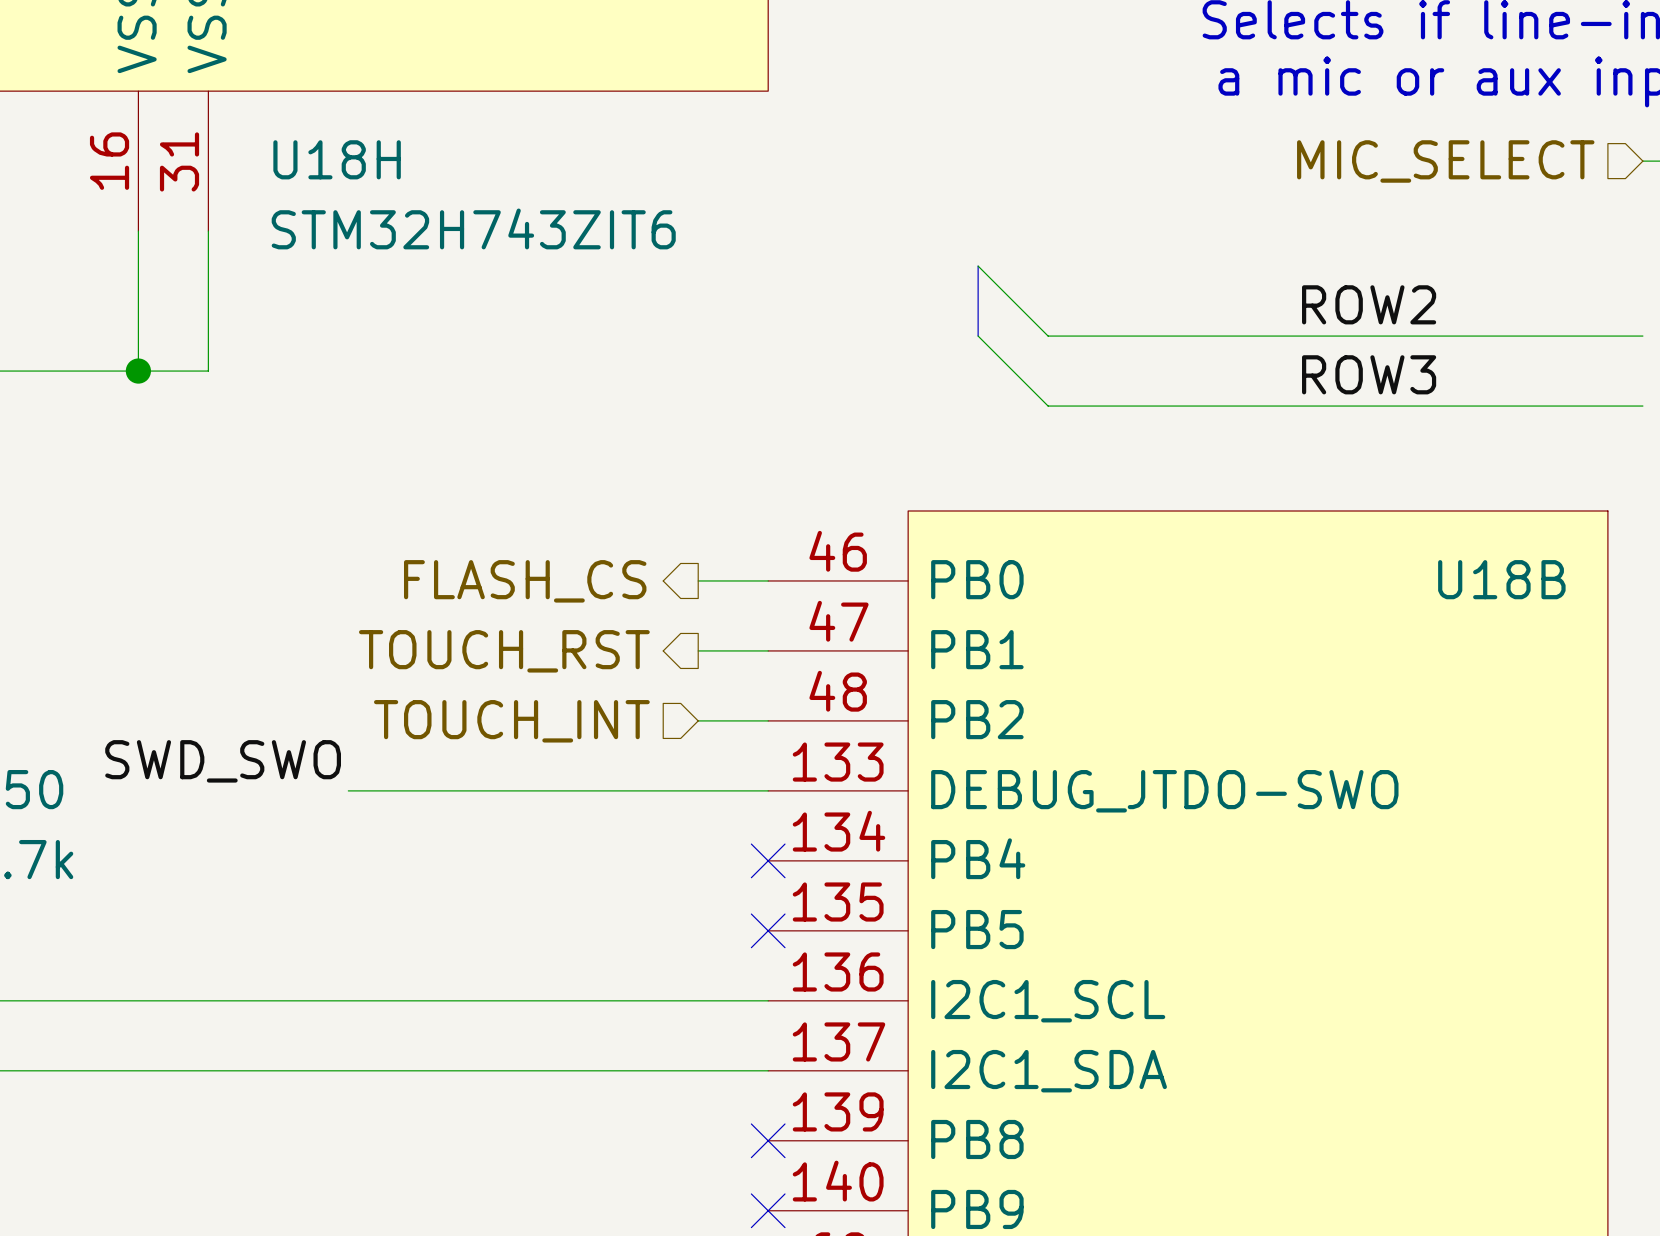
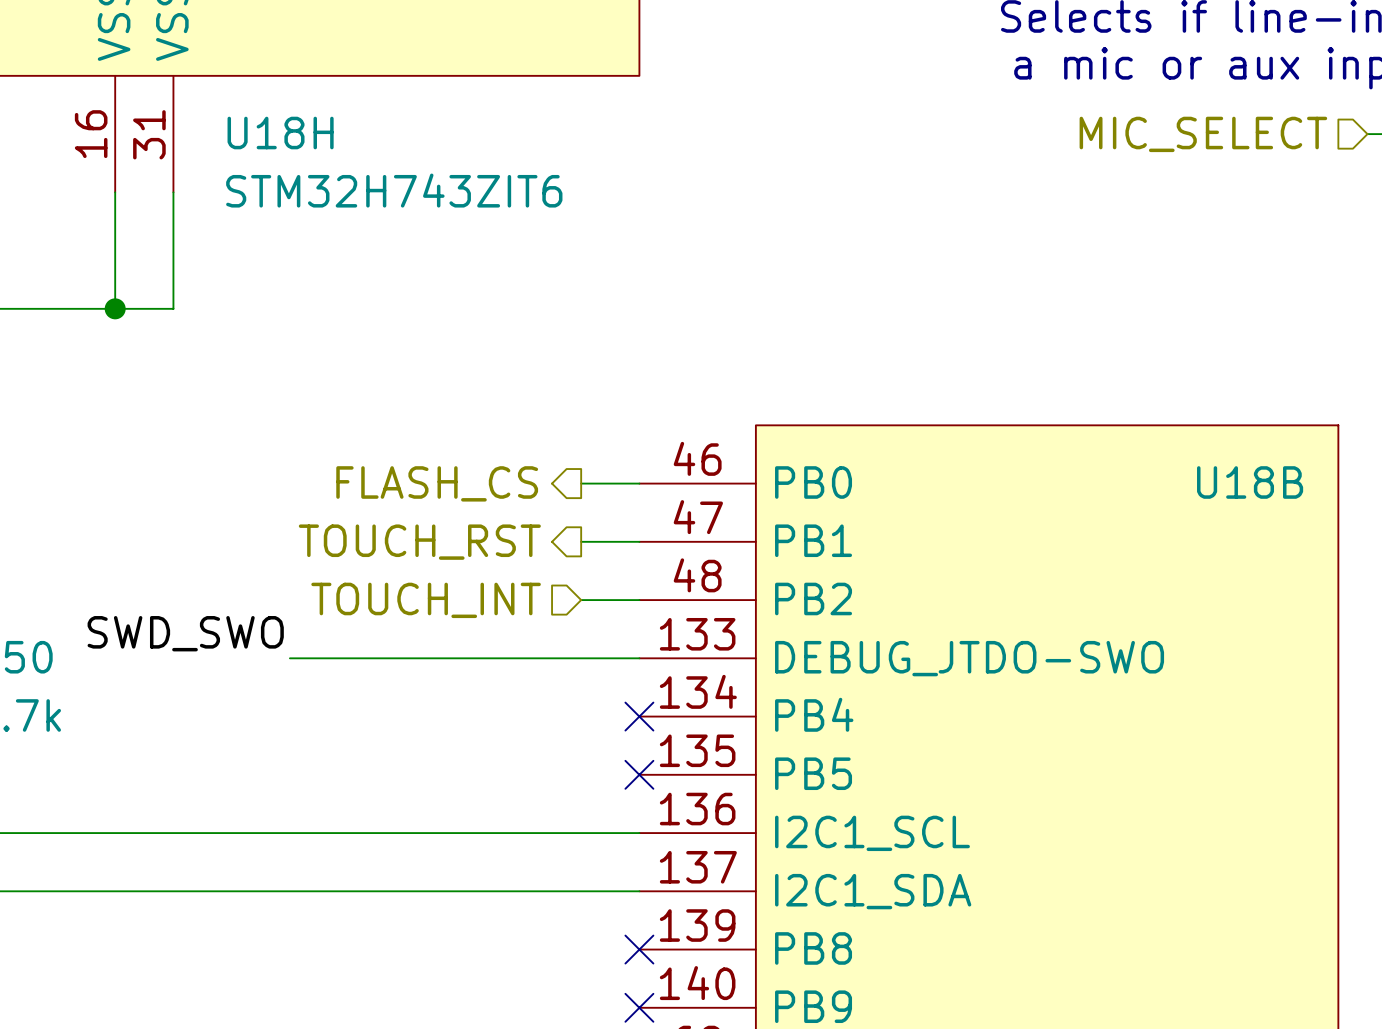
wire: (978, 266) (1048, 336) (1642, 336) -> none
bus: (978, 266) (978, 336) -> none
label: ROW2 (1369, 304) -> none
wire: (978, 336) (1048, 406) (1642, 406) -> none
label: ROW3 (1369, 374) -> none

